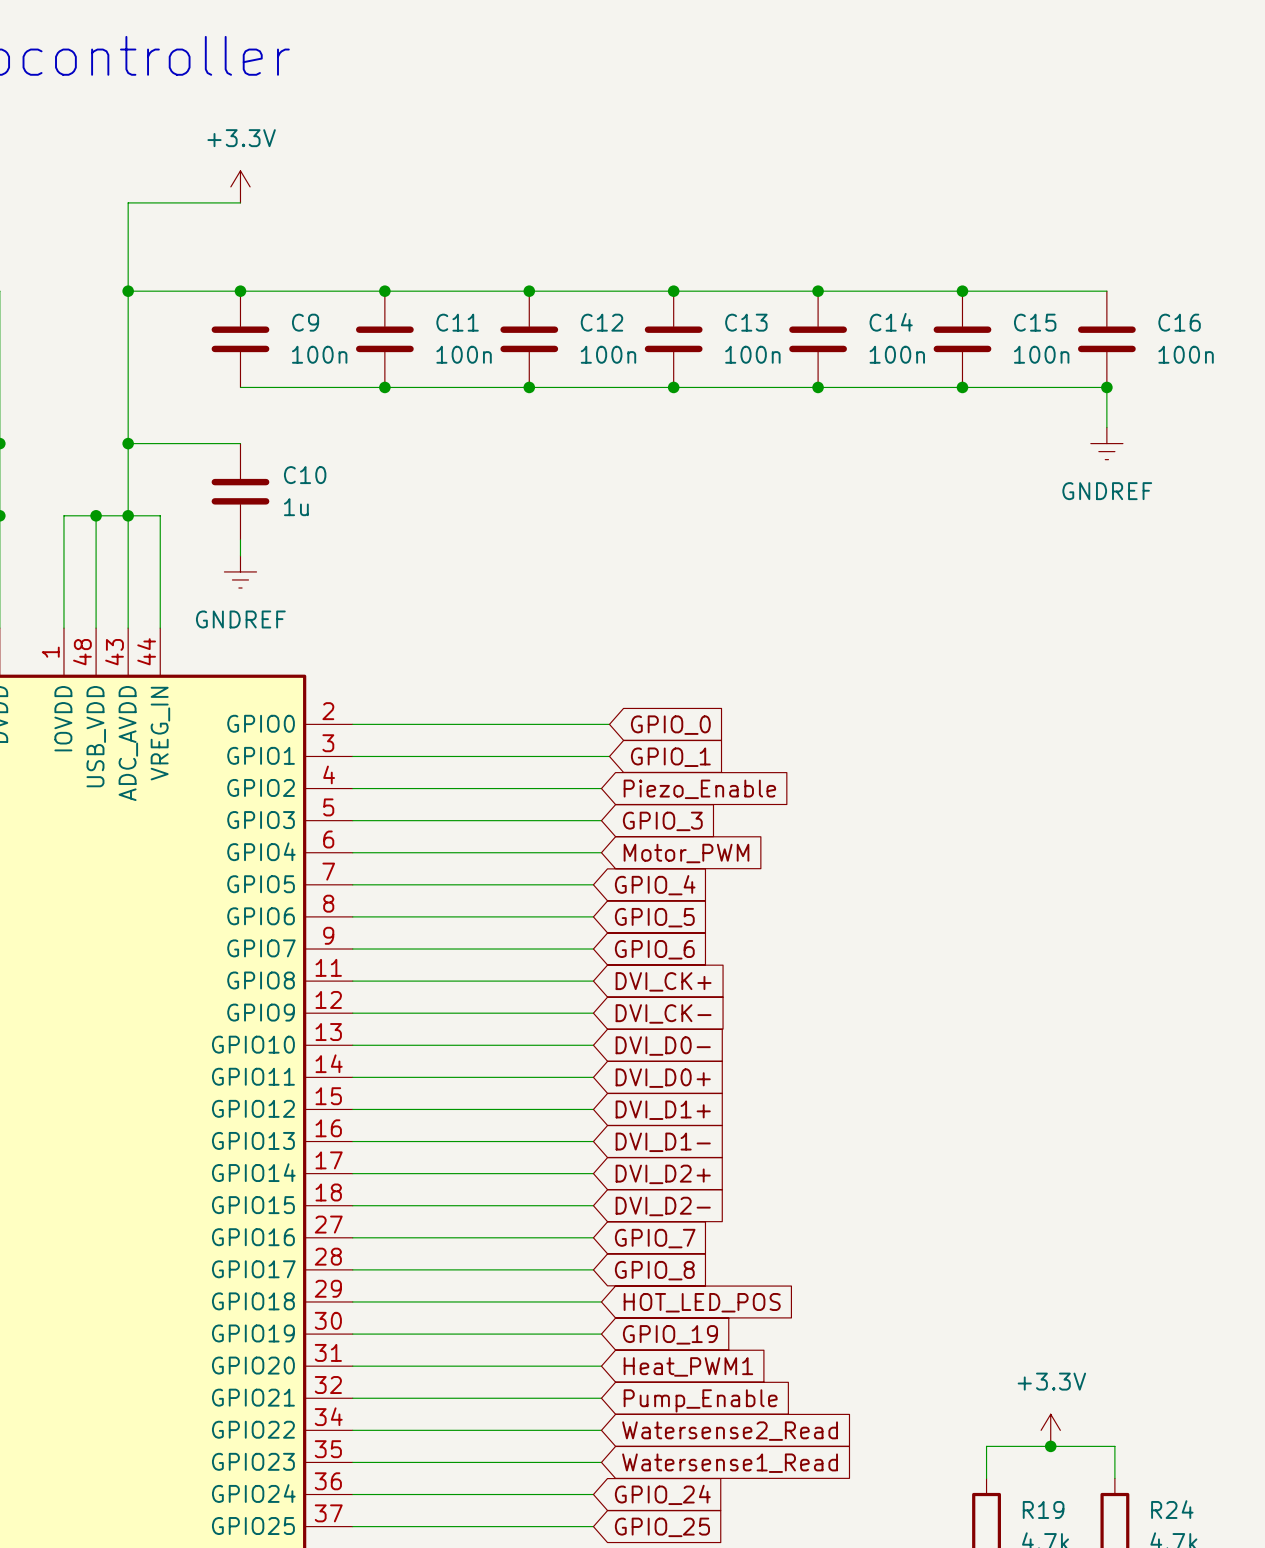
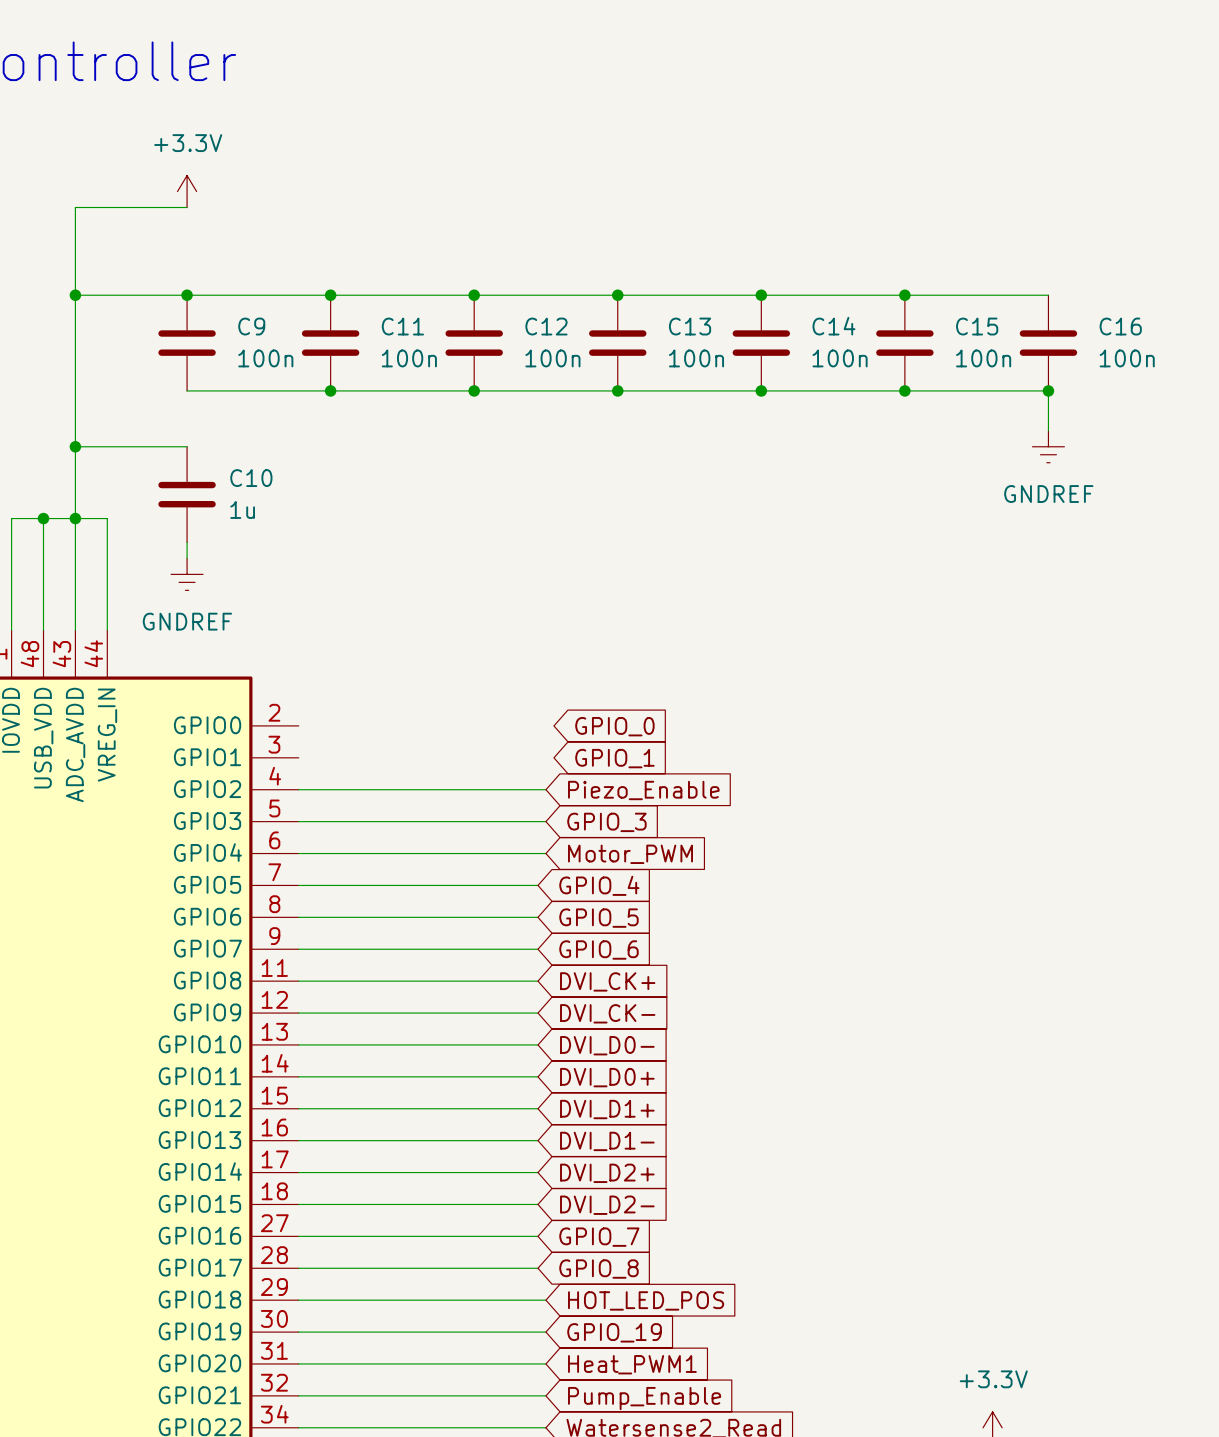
wire: (352, 724) (609, 724) -> none
wire: (352, 756) (609, 756) -> none

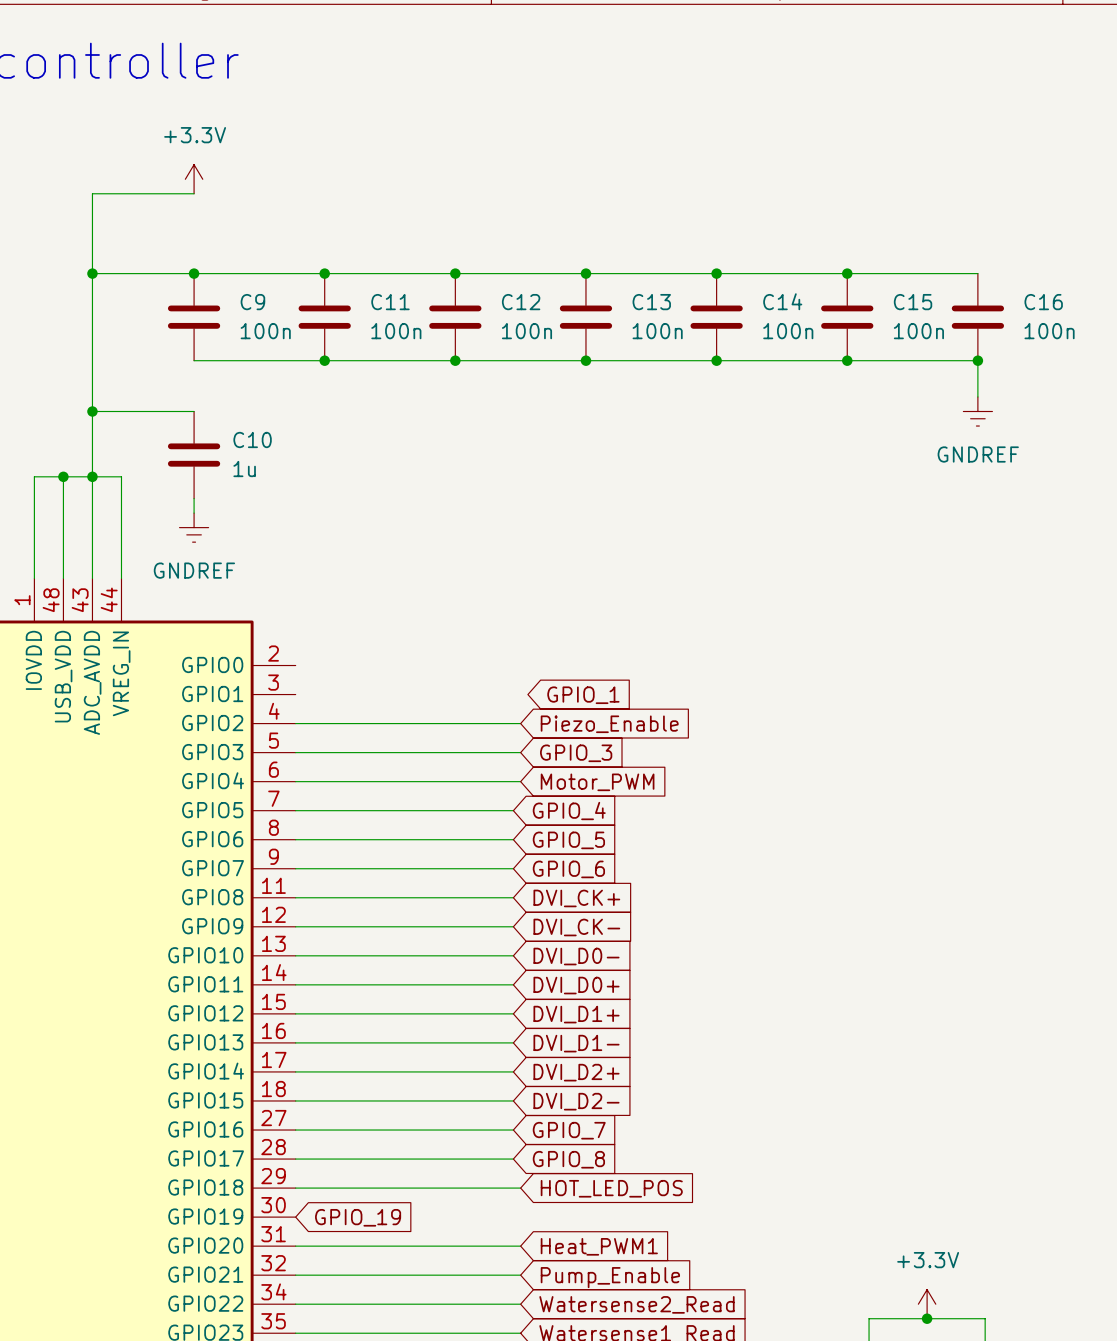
global label: GPIO_0 (614, 726) -> none
wire: (298, 1332) (545, 1332) -> none
global label position: GPIO_19 (614, 1332) -> GPIO_19 (358, 1217)

